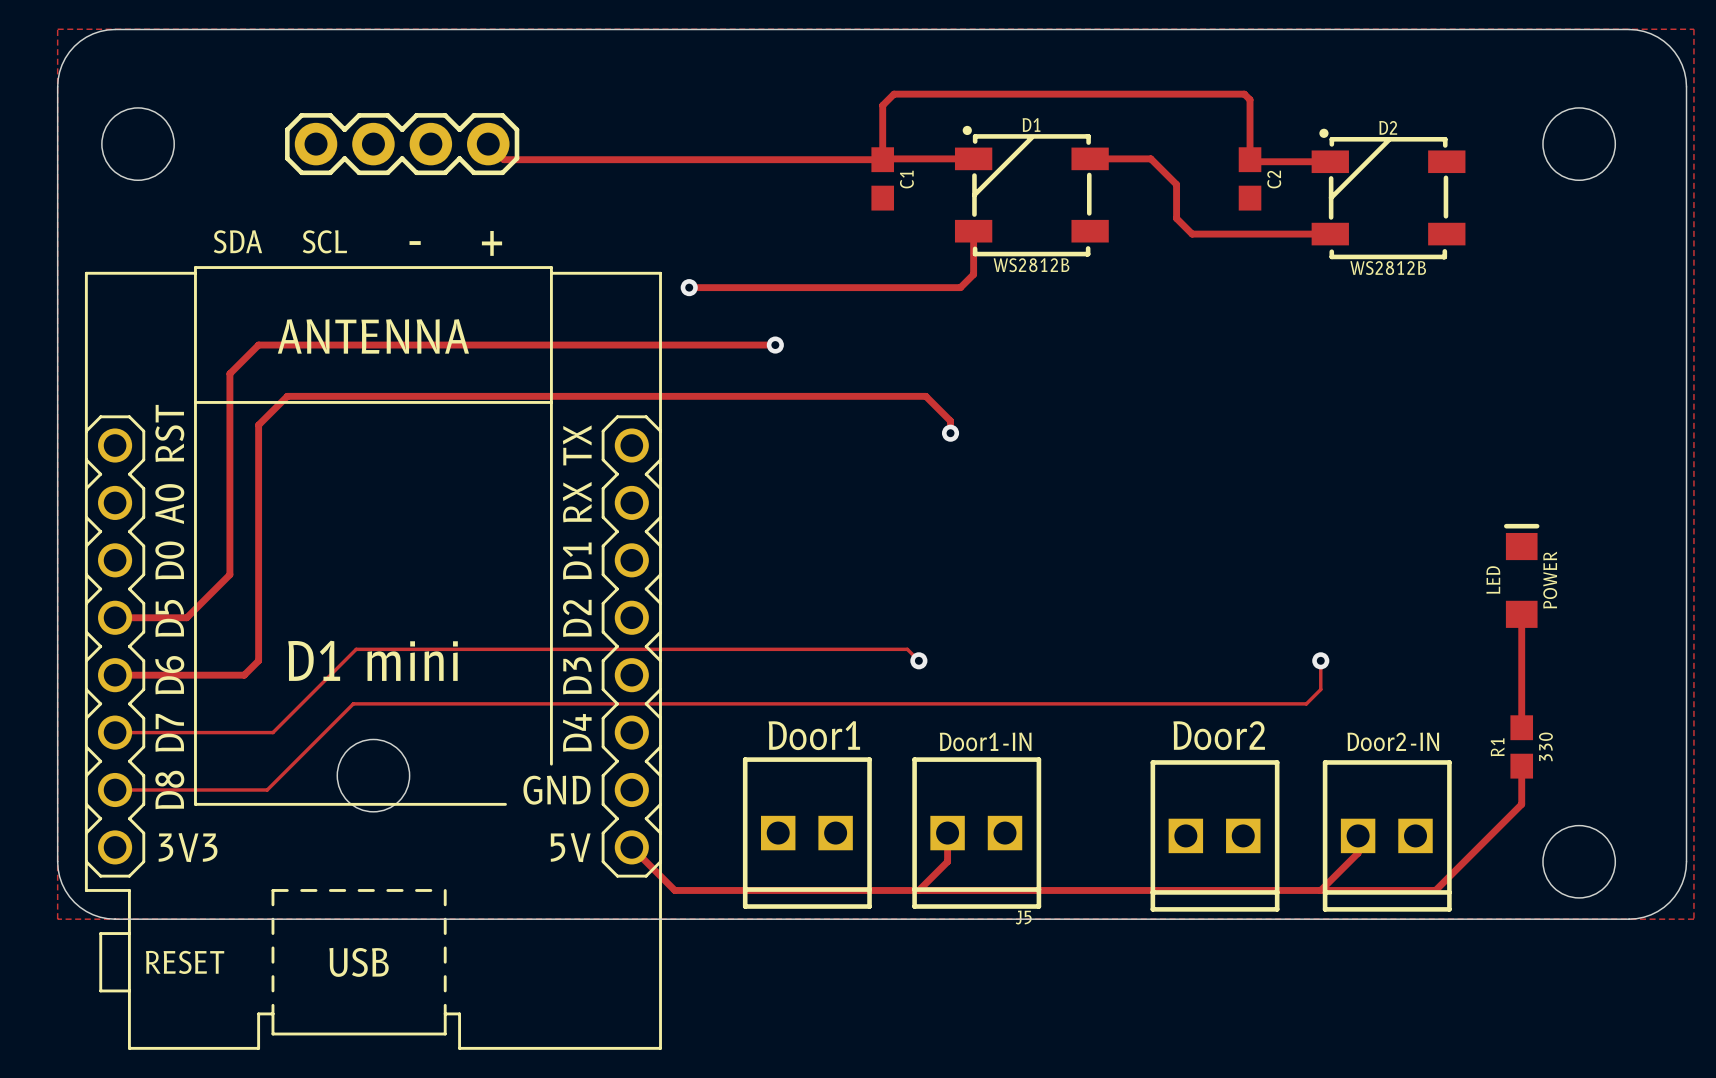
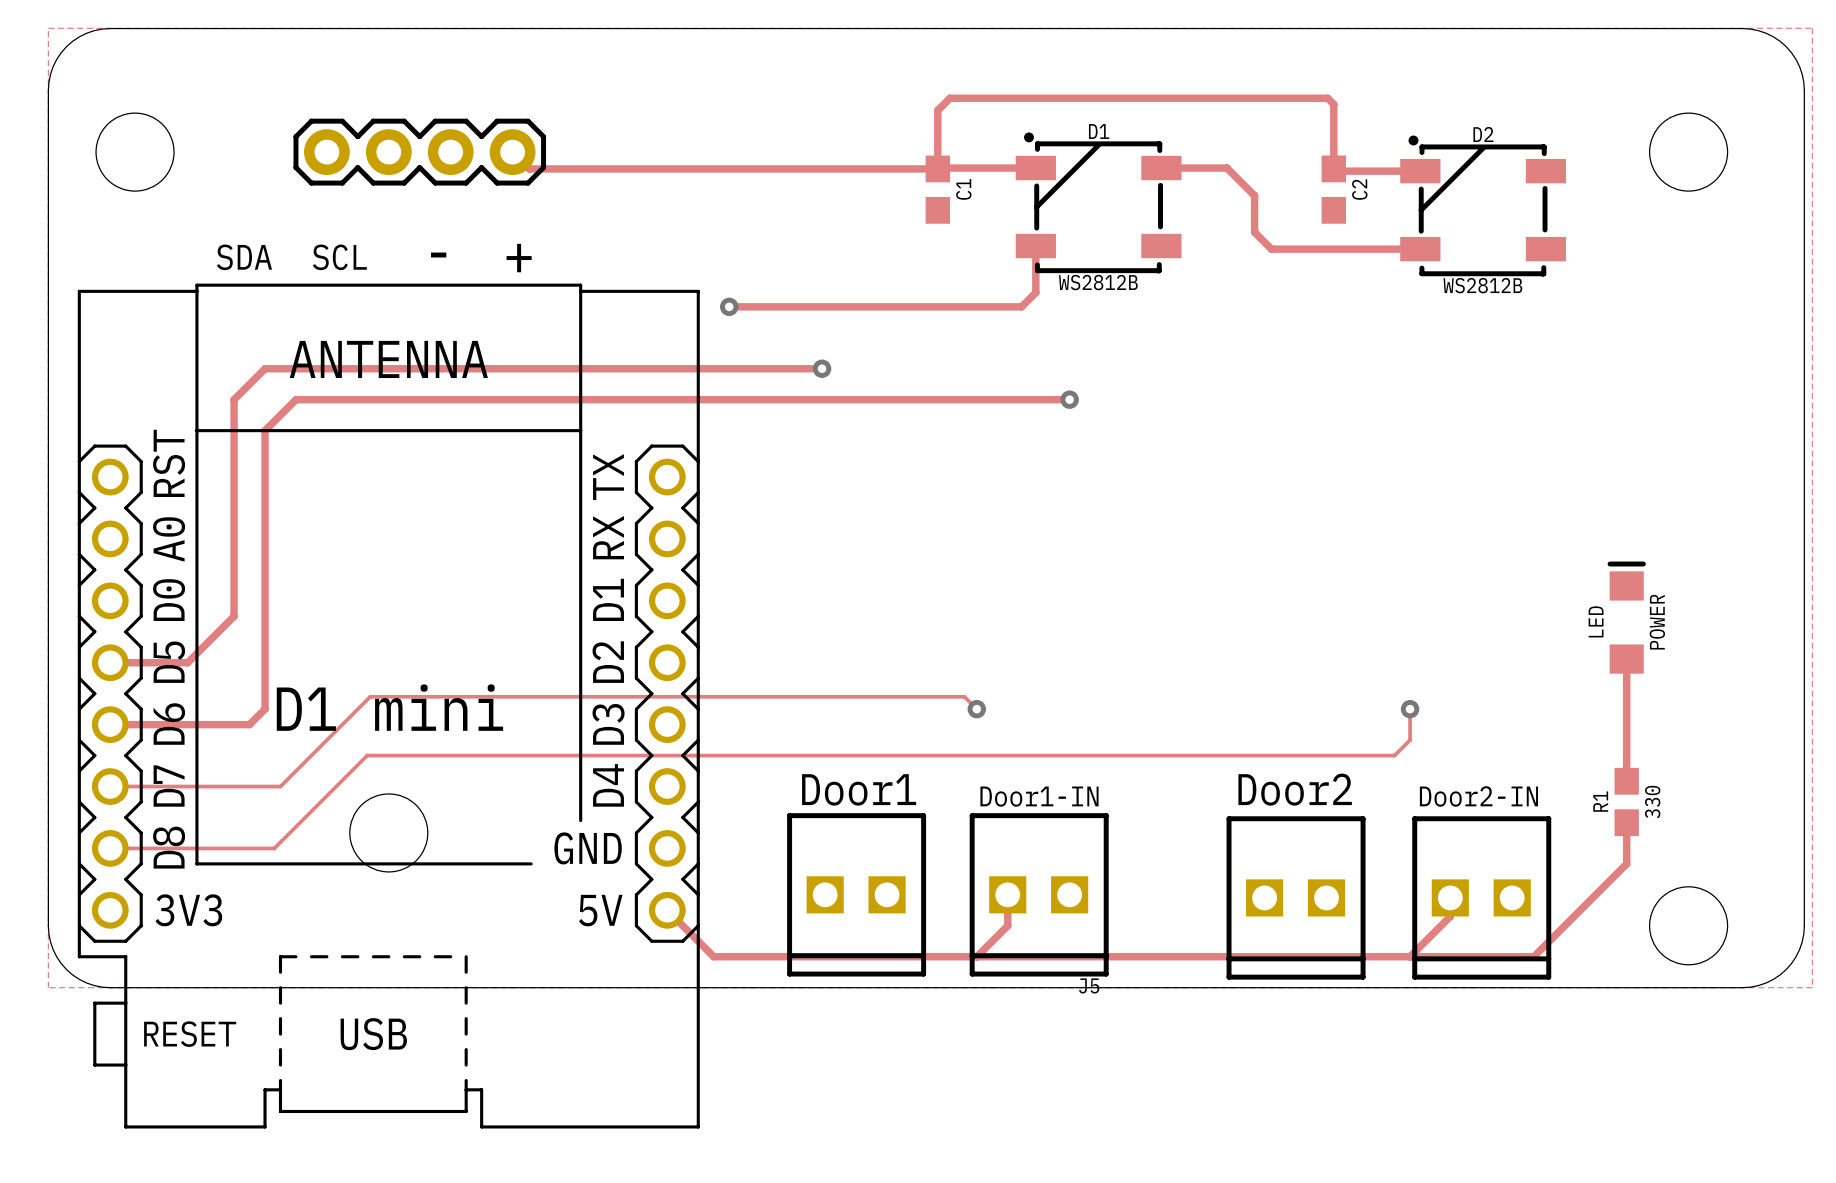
track: (258, 425) (287, 396) (925, 396) (950, 420) (950, 433) -> (265, 455) (265, 430) (295, 399) (1069, 399)
via position: (950, 433) -> (1069, 399)

